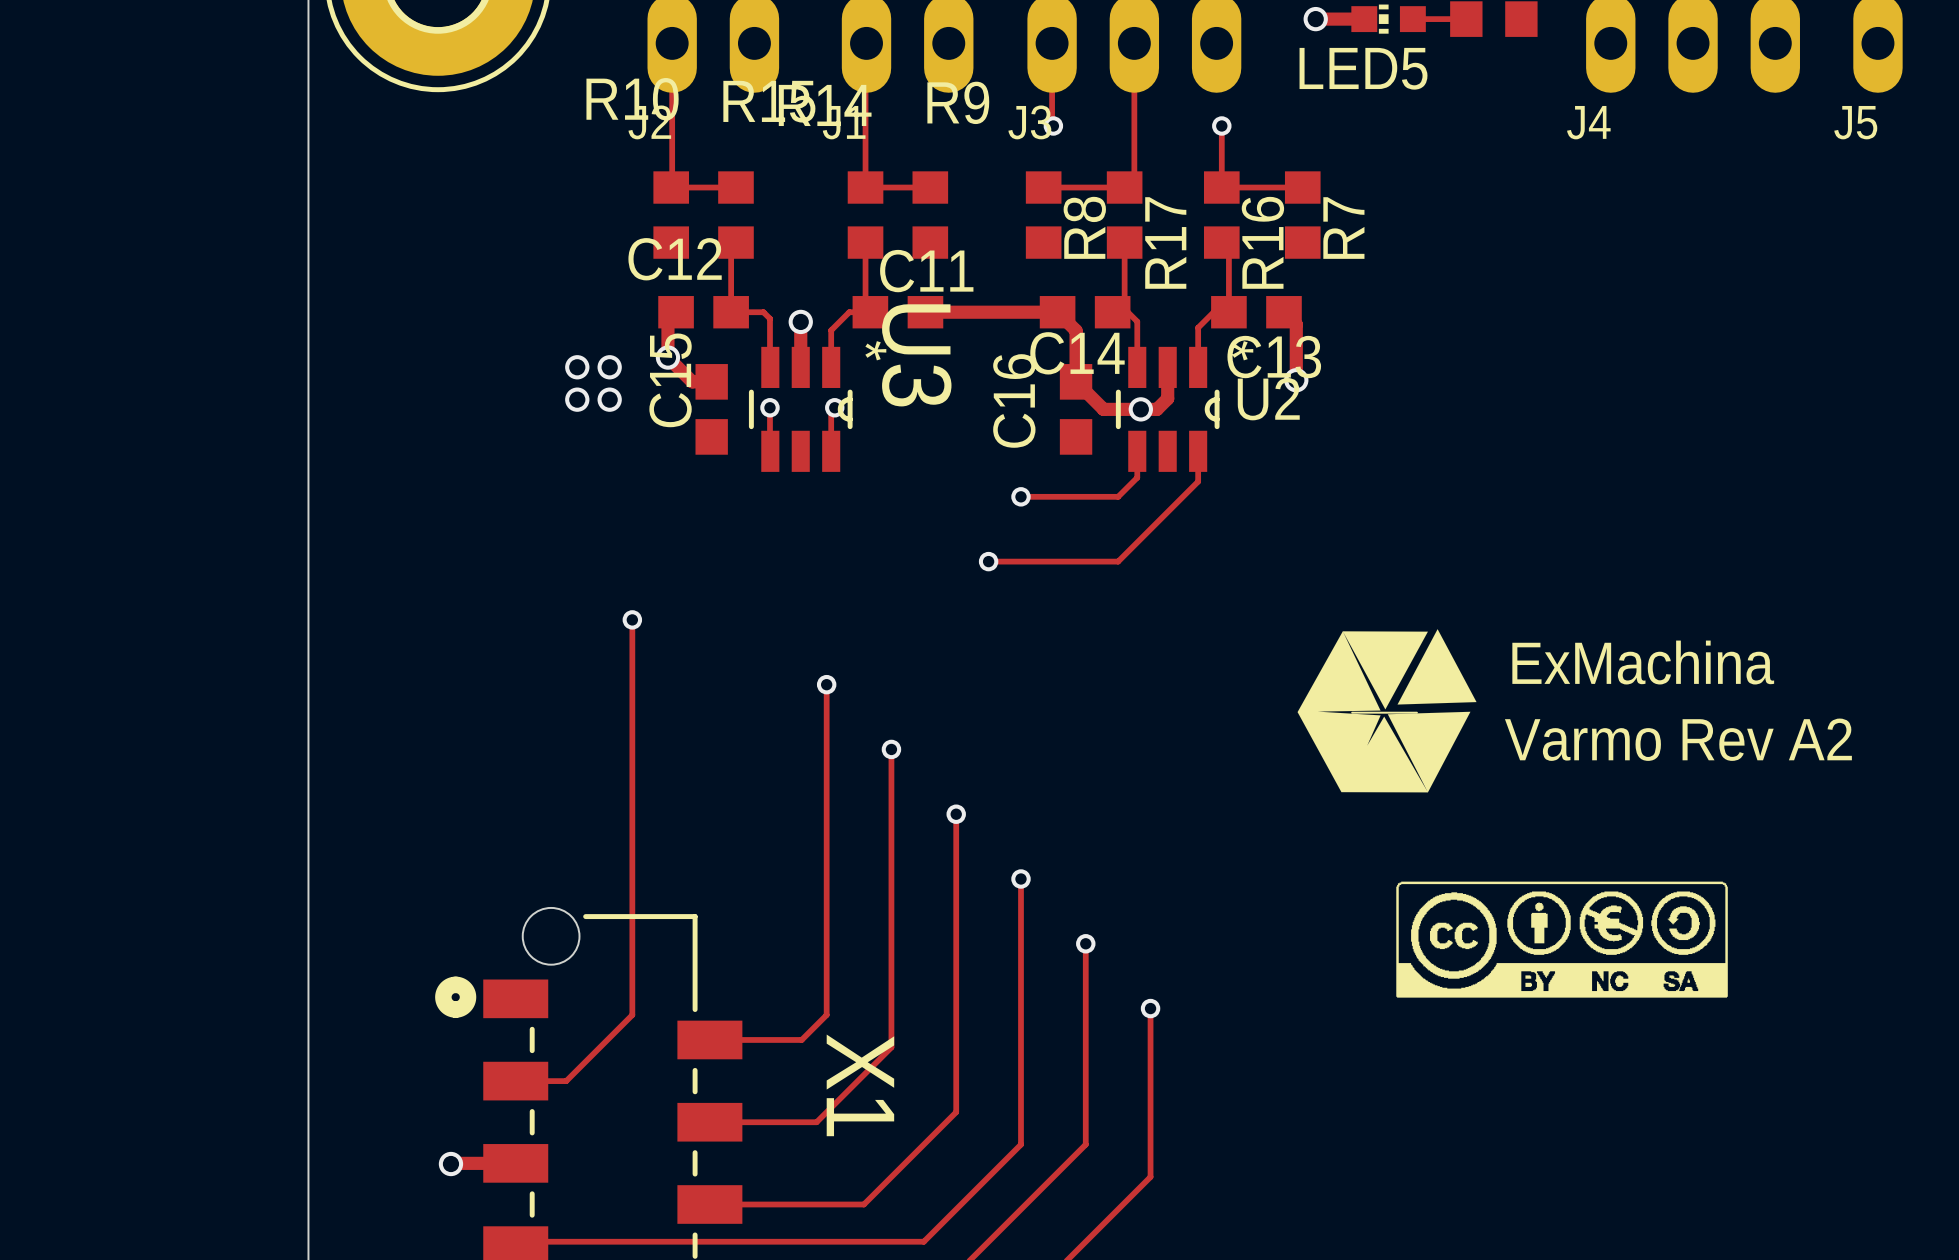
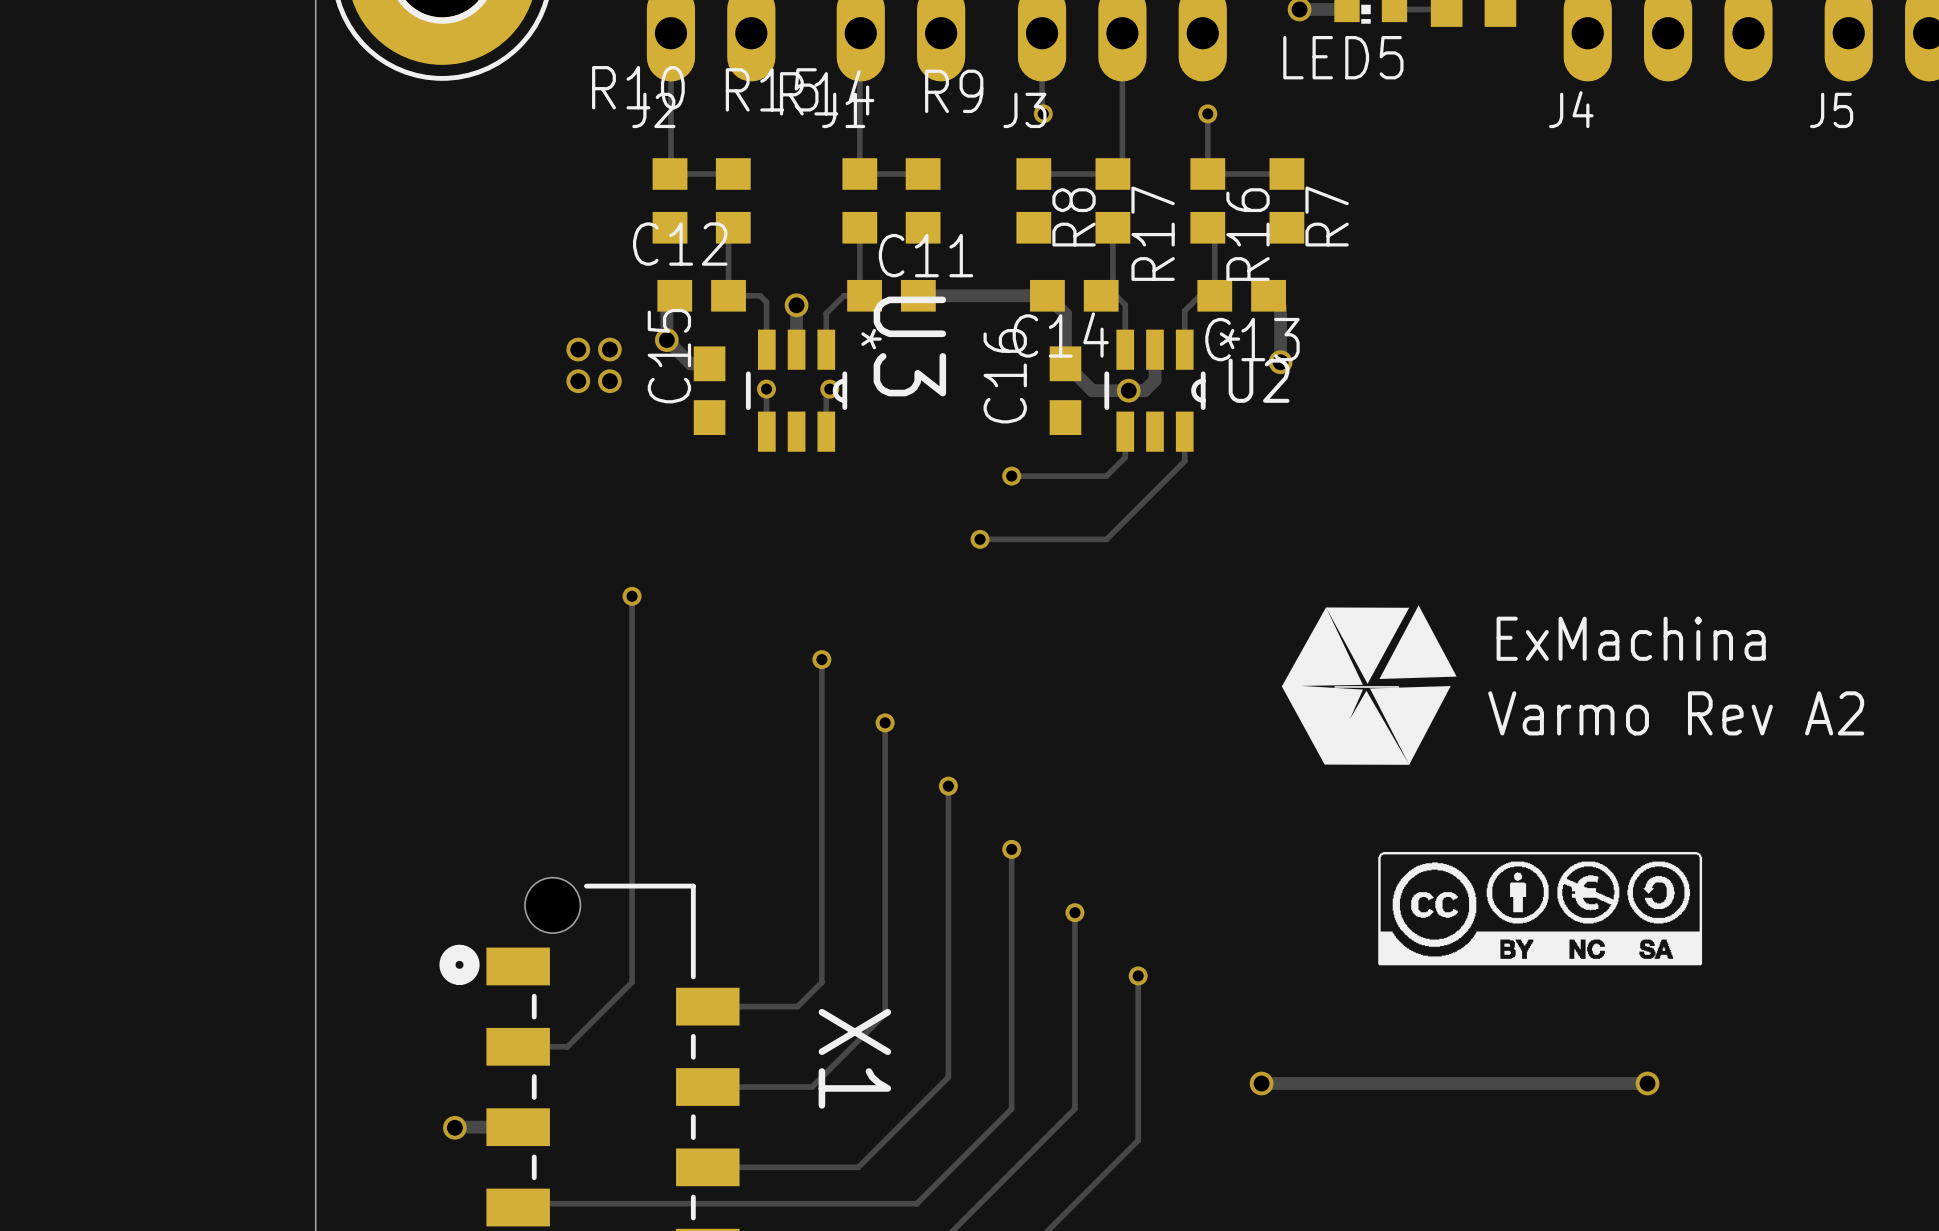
track: none -> (1261, 1083) (1647, 1083)
via: none -> (1261, 1083)
via: none -> (1647, 1083)

